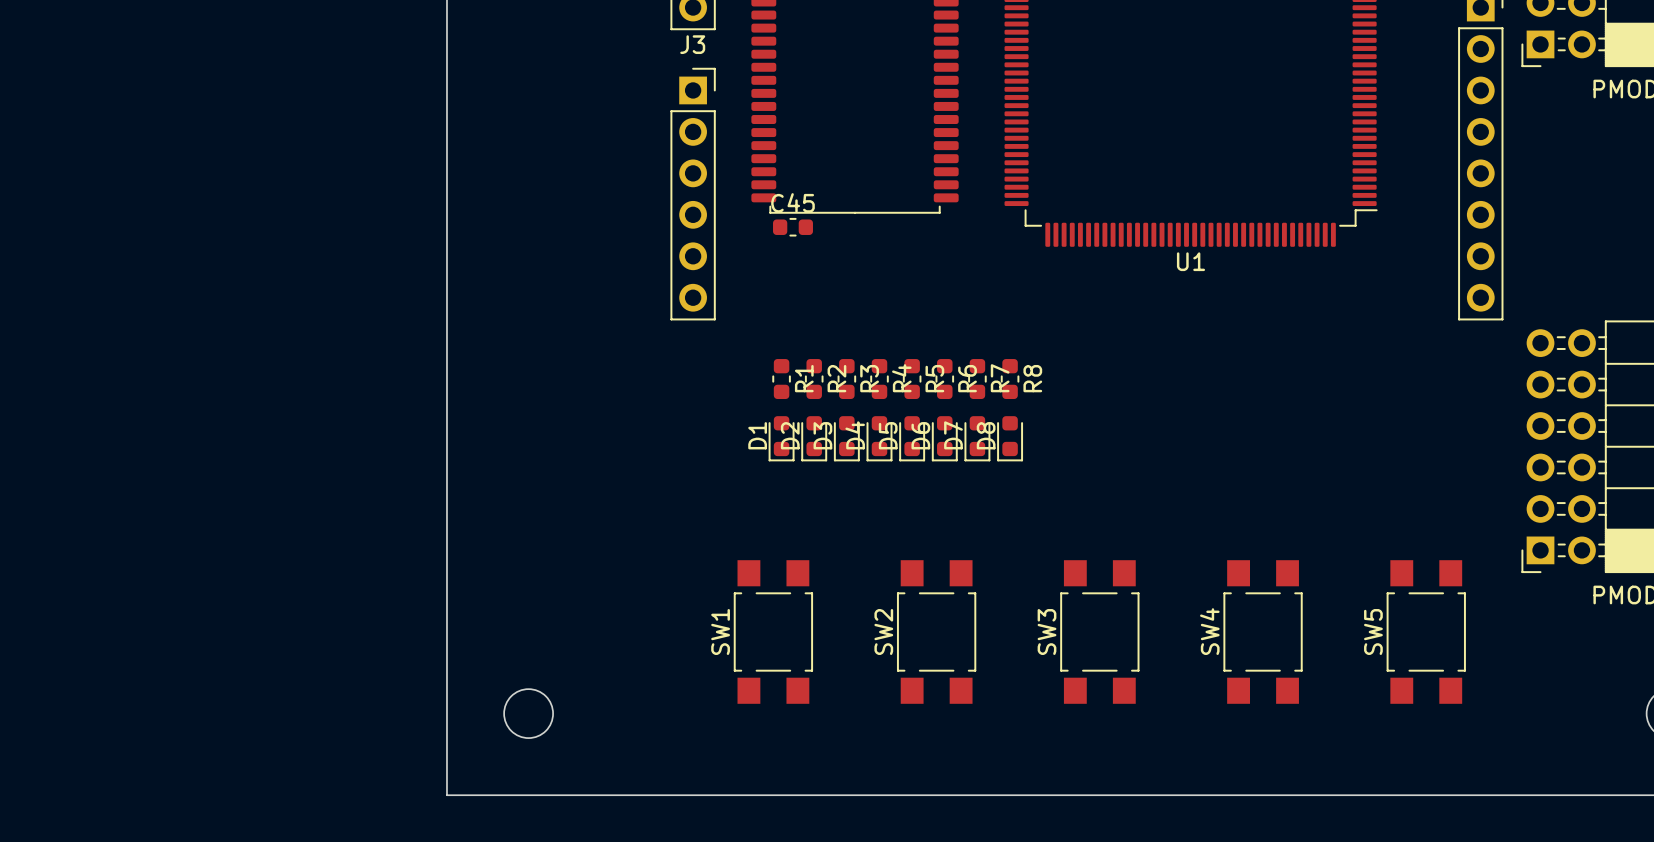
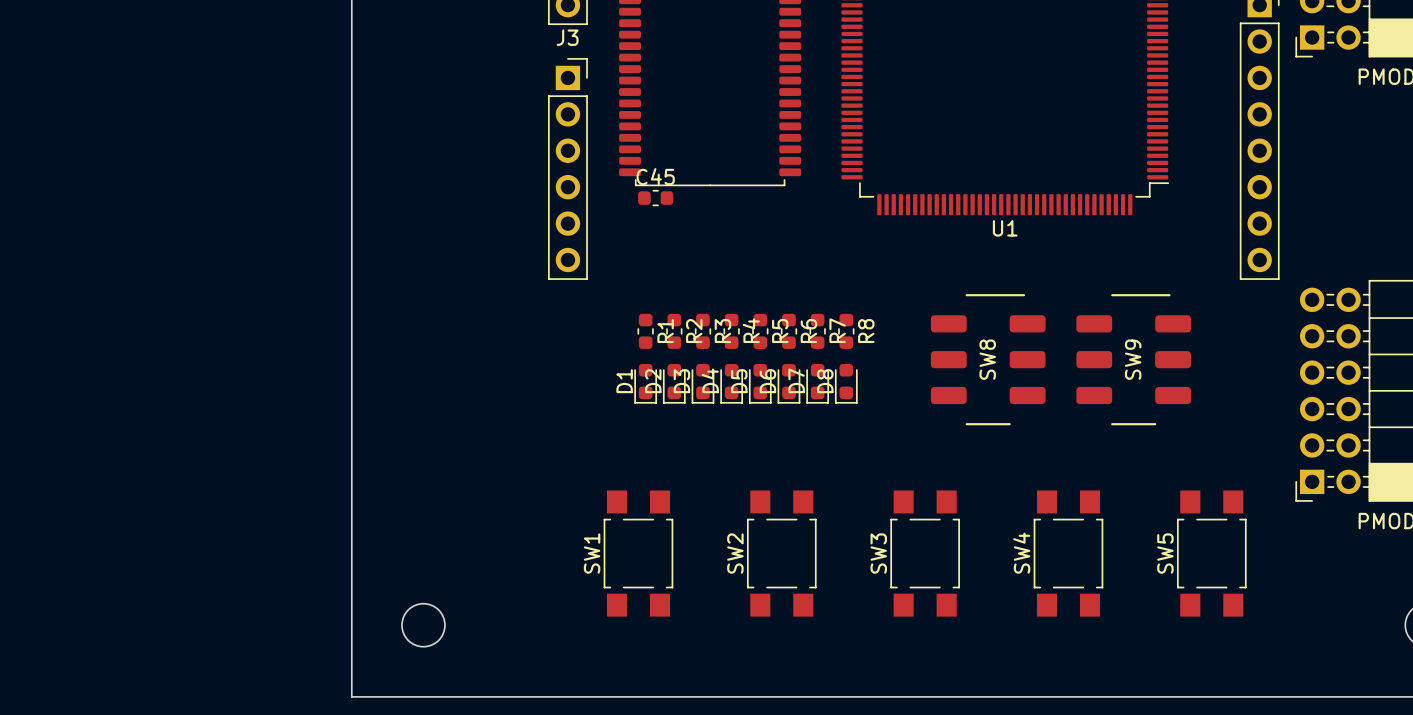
SW8: none -> (988, 359)
SW9: none -> (1133, 359)

